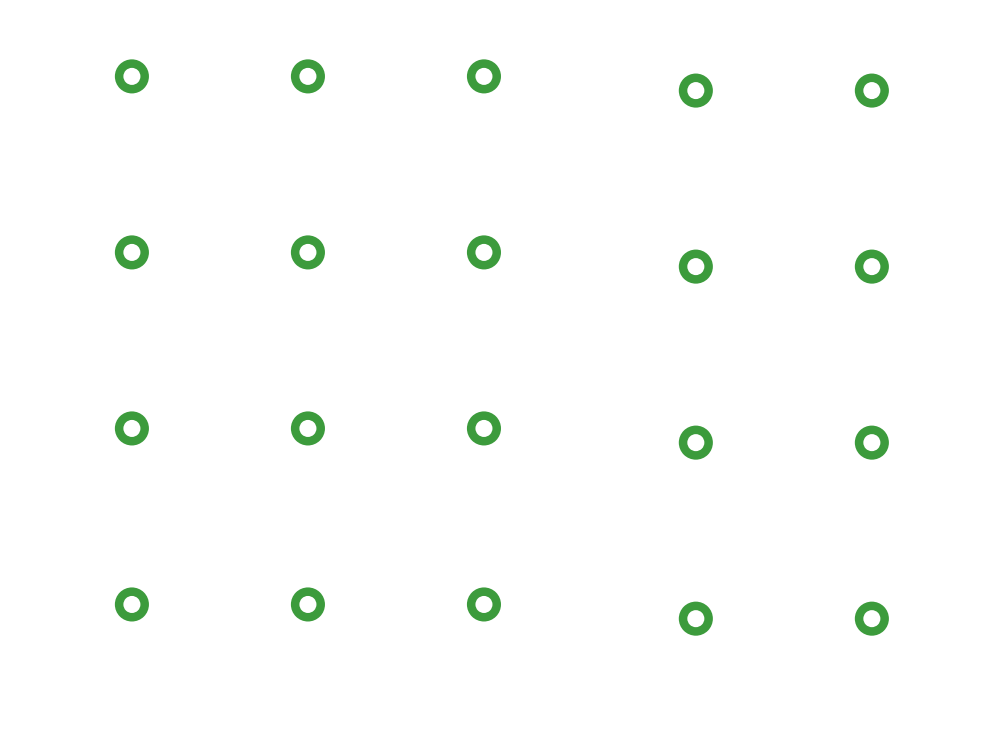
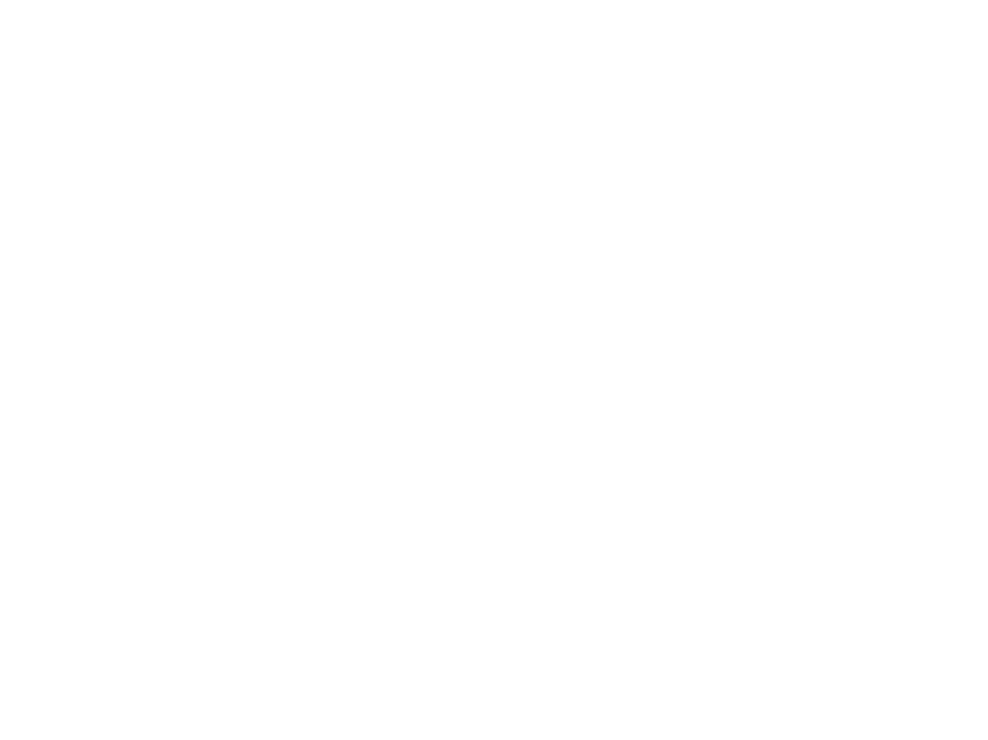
via: (131, 76) -> none
via: (307, 76) -> none
via: (483, 76) -> none
via: (695, 90) -> none
via: (871, 90) -> none
via: (131, 252) -> none
via: (307, 252) -> none
via: (483, 252) -> none
via: (695, 266) -> none
via: (871, 266) -> none
via: (131, 428) -> none
via: (307, 428) -> none
via: (483, 428) -> none
via: (695, 442) -> none
via: (871, 442) -> none
via: (131, 604) -> none
via: (307, 604) -> none
via: (483, 604) -> none
via: (695, 618) -> none
via: (871, 618) -> none

